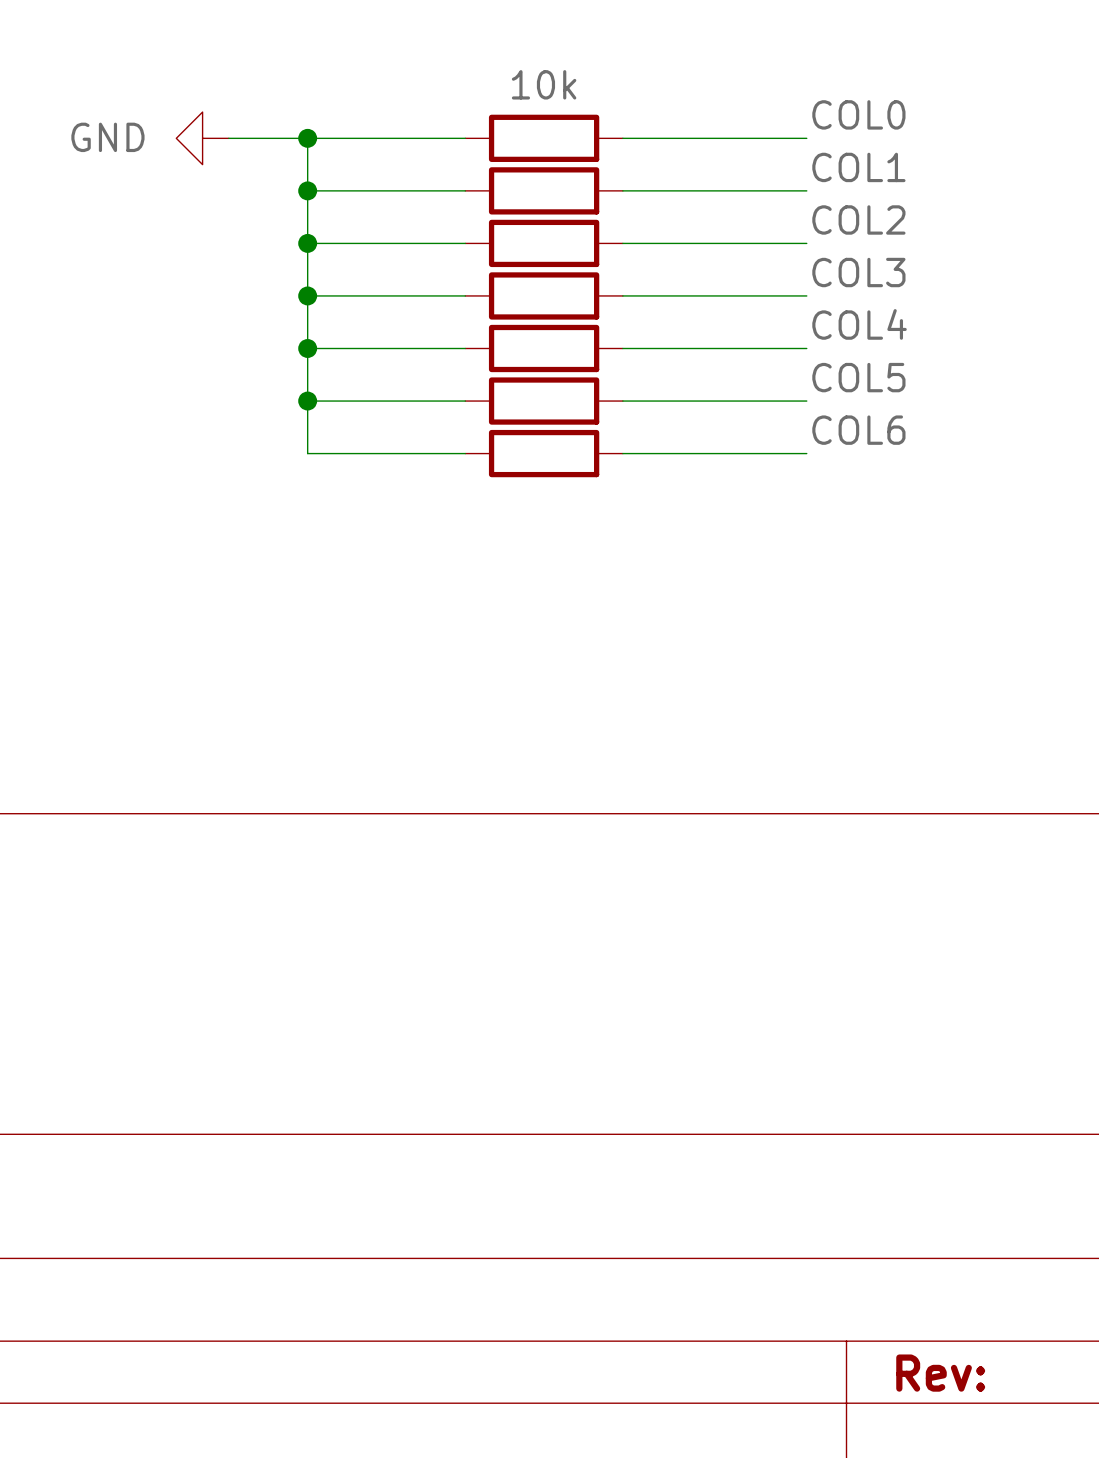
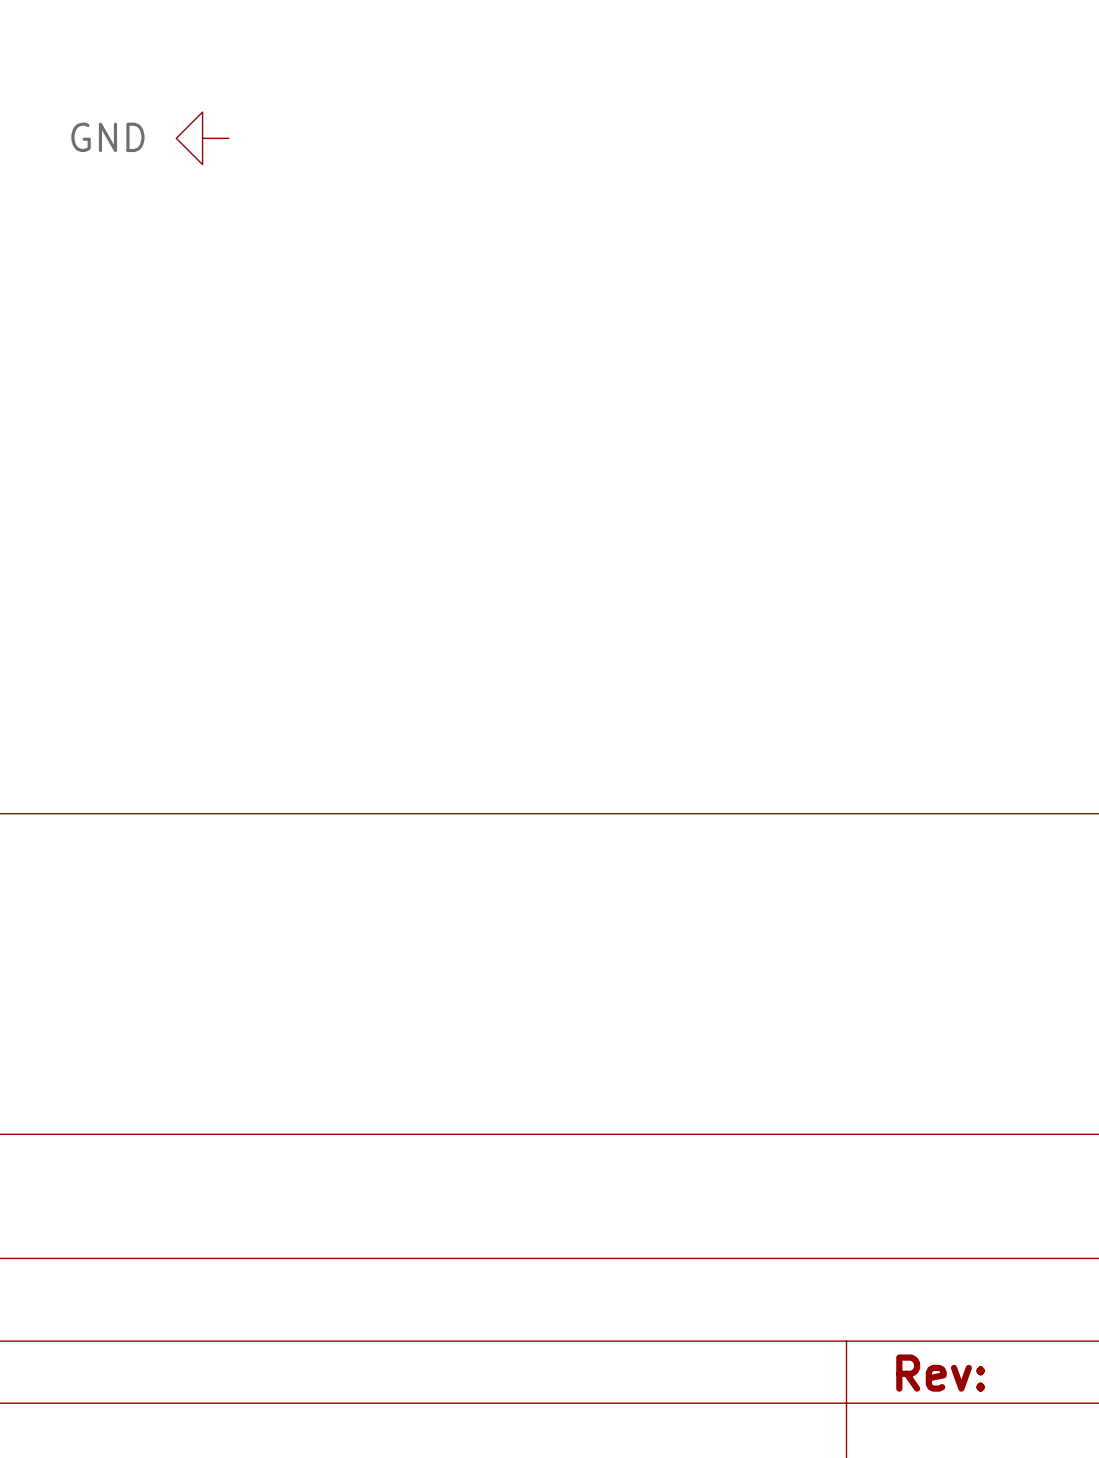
label: COL0 (858, 114) -> none
wire: (228, 138) (465, 138) -> none
wire: (307, 138) (307, 453) (465, 453) -> none
junction: (307, 138) -> none
part: 10k (544, 138) -> none
wire: (622, 138) (806, 138) -> none
label: COL1 (858, 167) -> none
wire: (307, 190) (465, 190) -> none
junction: (307, 190) -> none
part: (544, 190) -> none
wire: (622, 190) (806, 190) -> none
label: COL2 (858, 219) -> none
wire: (307, 243) (465, 243) -> none
junction: (307, 243) -> none
part: (544, 243) -> none
wire: (622, 243) (806, 243) -> none
label: COL3 (858, 272) -> none
wire: (307, 295) (465, 295) -> none
junction: (307, 295) -> none
part: (544, 295) -> none
wire: (622, 295) (806, 295) -> none
label: COL4 (859, 324) -> none
wire: (307, 348) (465, 348) -> none
junction: (307, 348) -> none
part: (544, 348) -> none
wire: (622, 348) (806, 348) -> none
label: COL5 (858, 377) -> none
wire: (307, 401) (465, 401) -> none
junction: (307, 401) -> none
part: (544, 401) -> none
wire: (622, 401) (806, 401) -> none
label: COL6 (858, 430) -> none
part: (544, 453) -> none
wire: (622, 453) (806, 453) -> none

